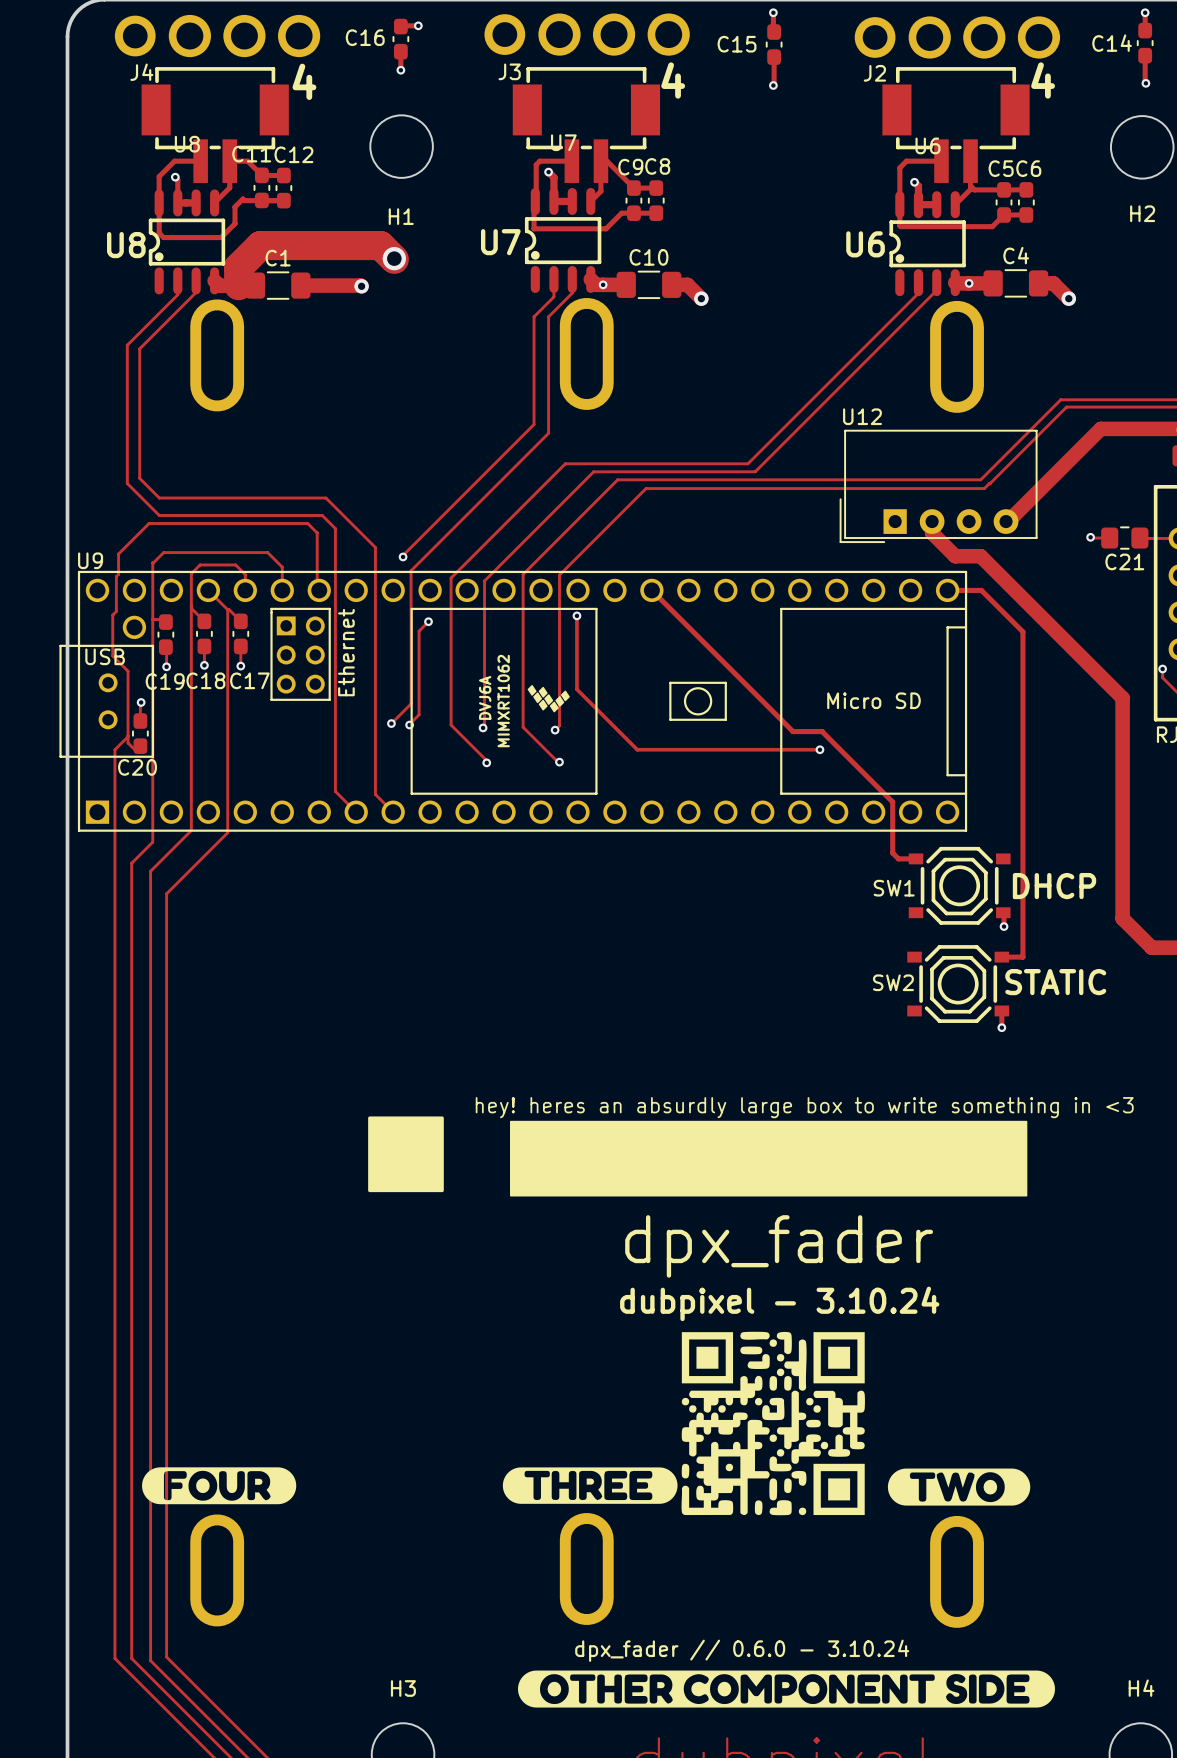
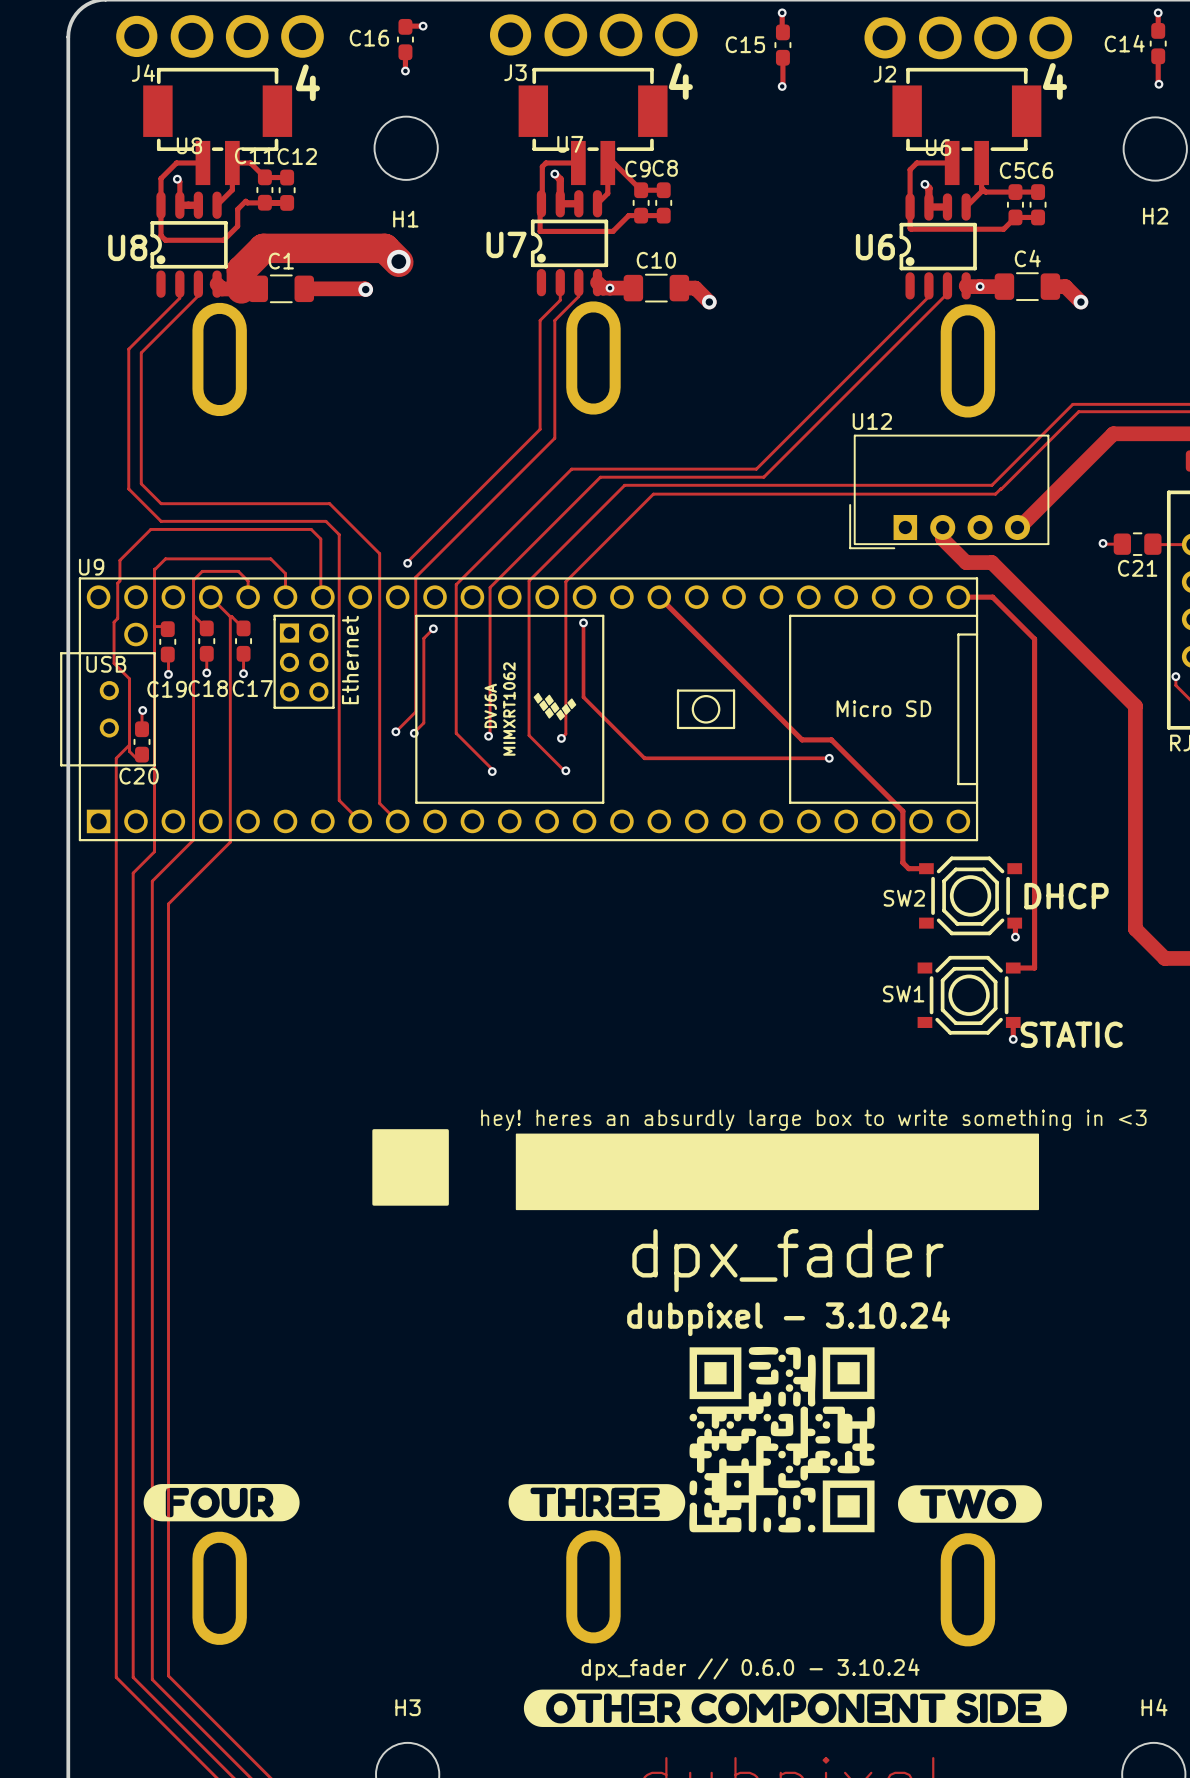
SW1 name: SW1 (894, 888) -> SW2 (904, 898)
SW2 name: SW2 (893, 982) -> SW1 (903, 993)
text position: STATIC (1055, 982) -> STATIC (1071, 1034)

